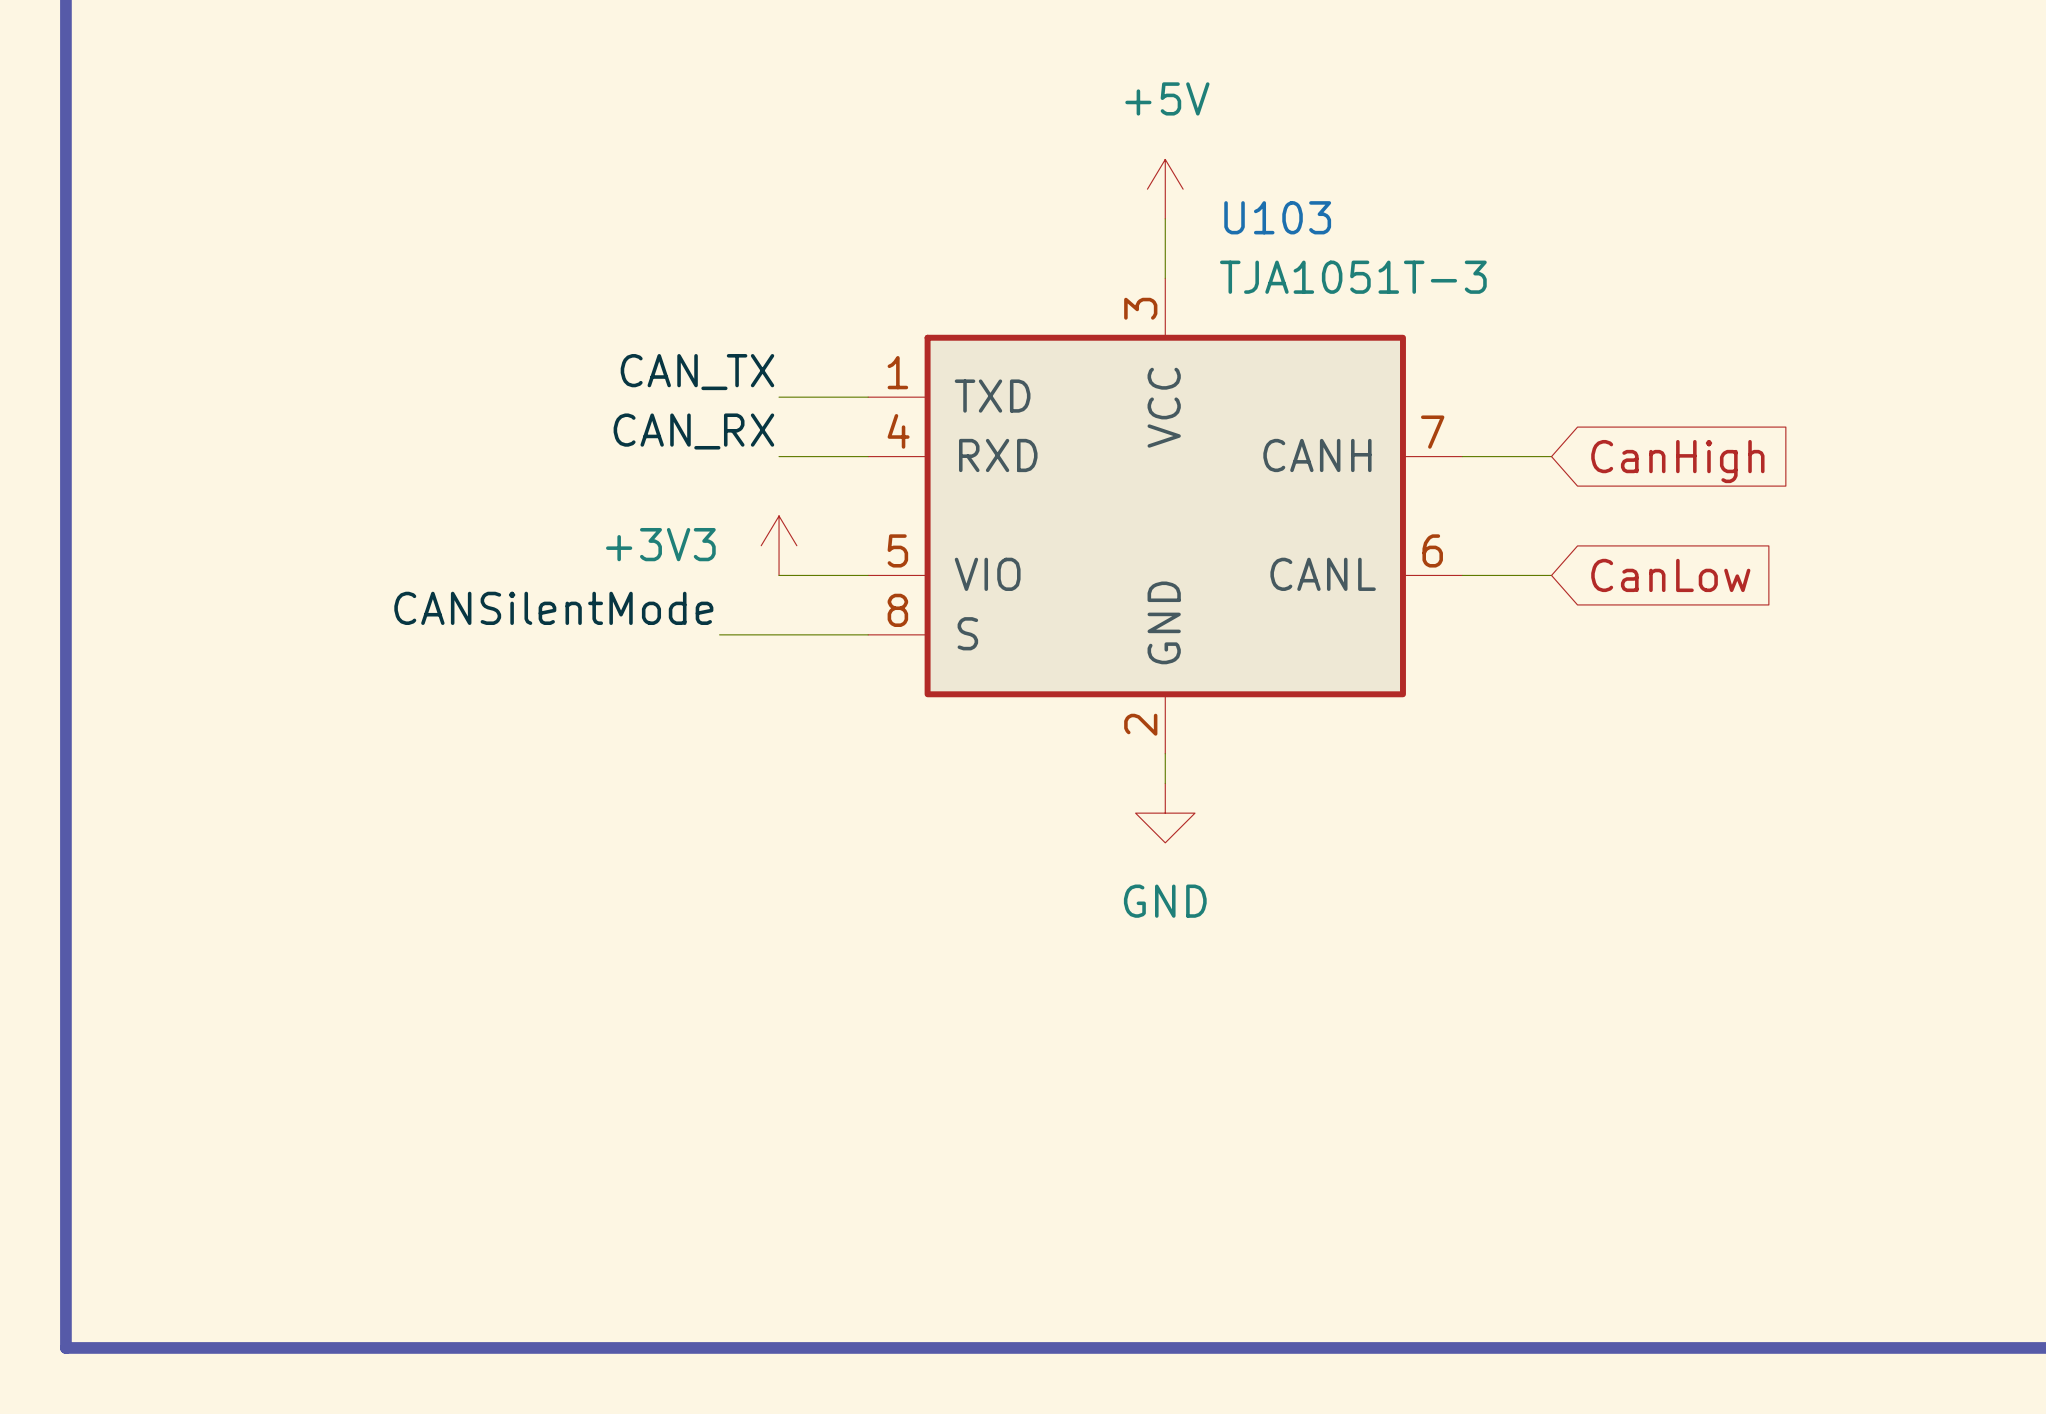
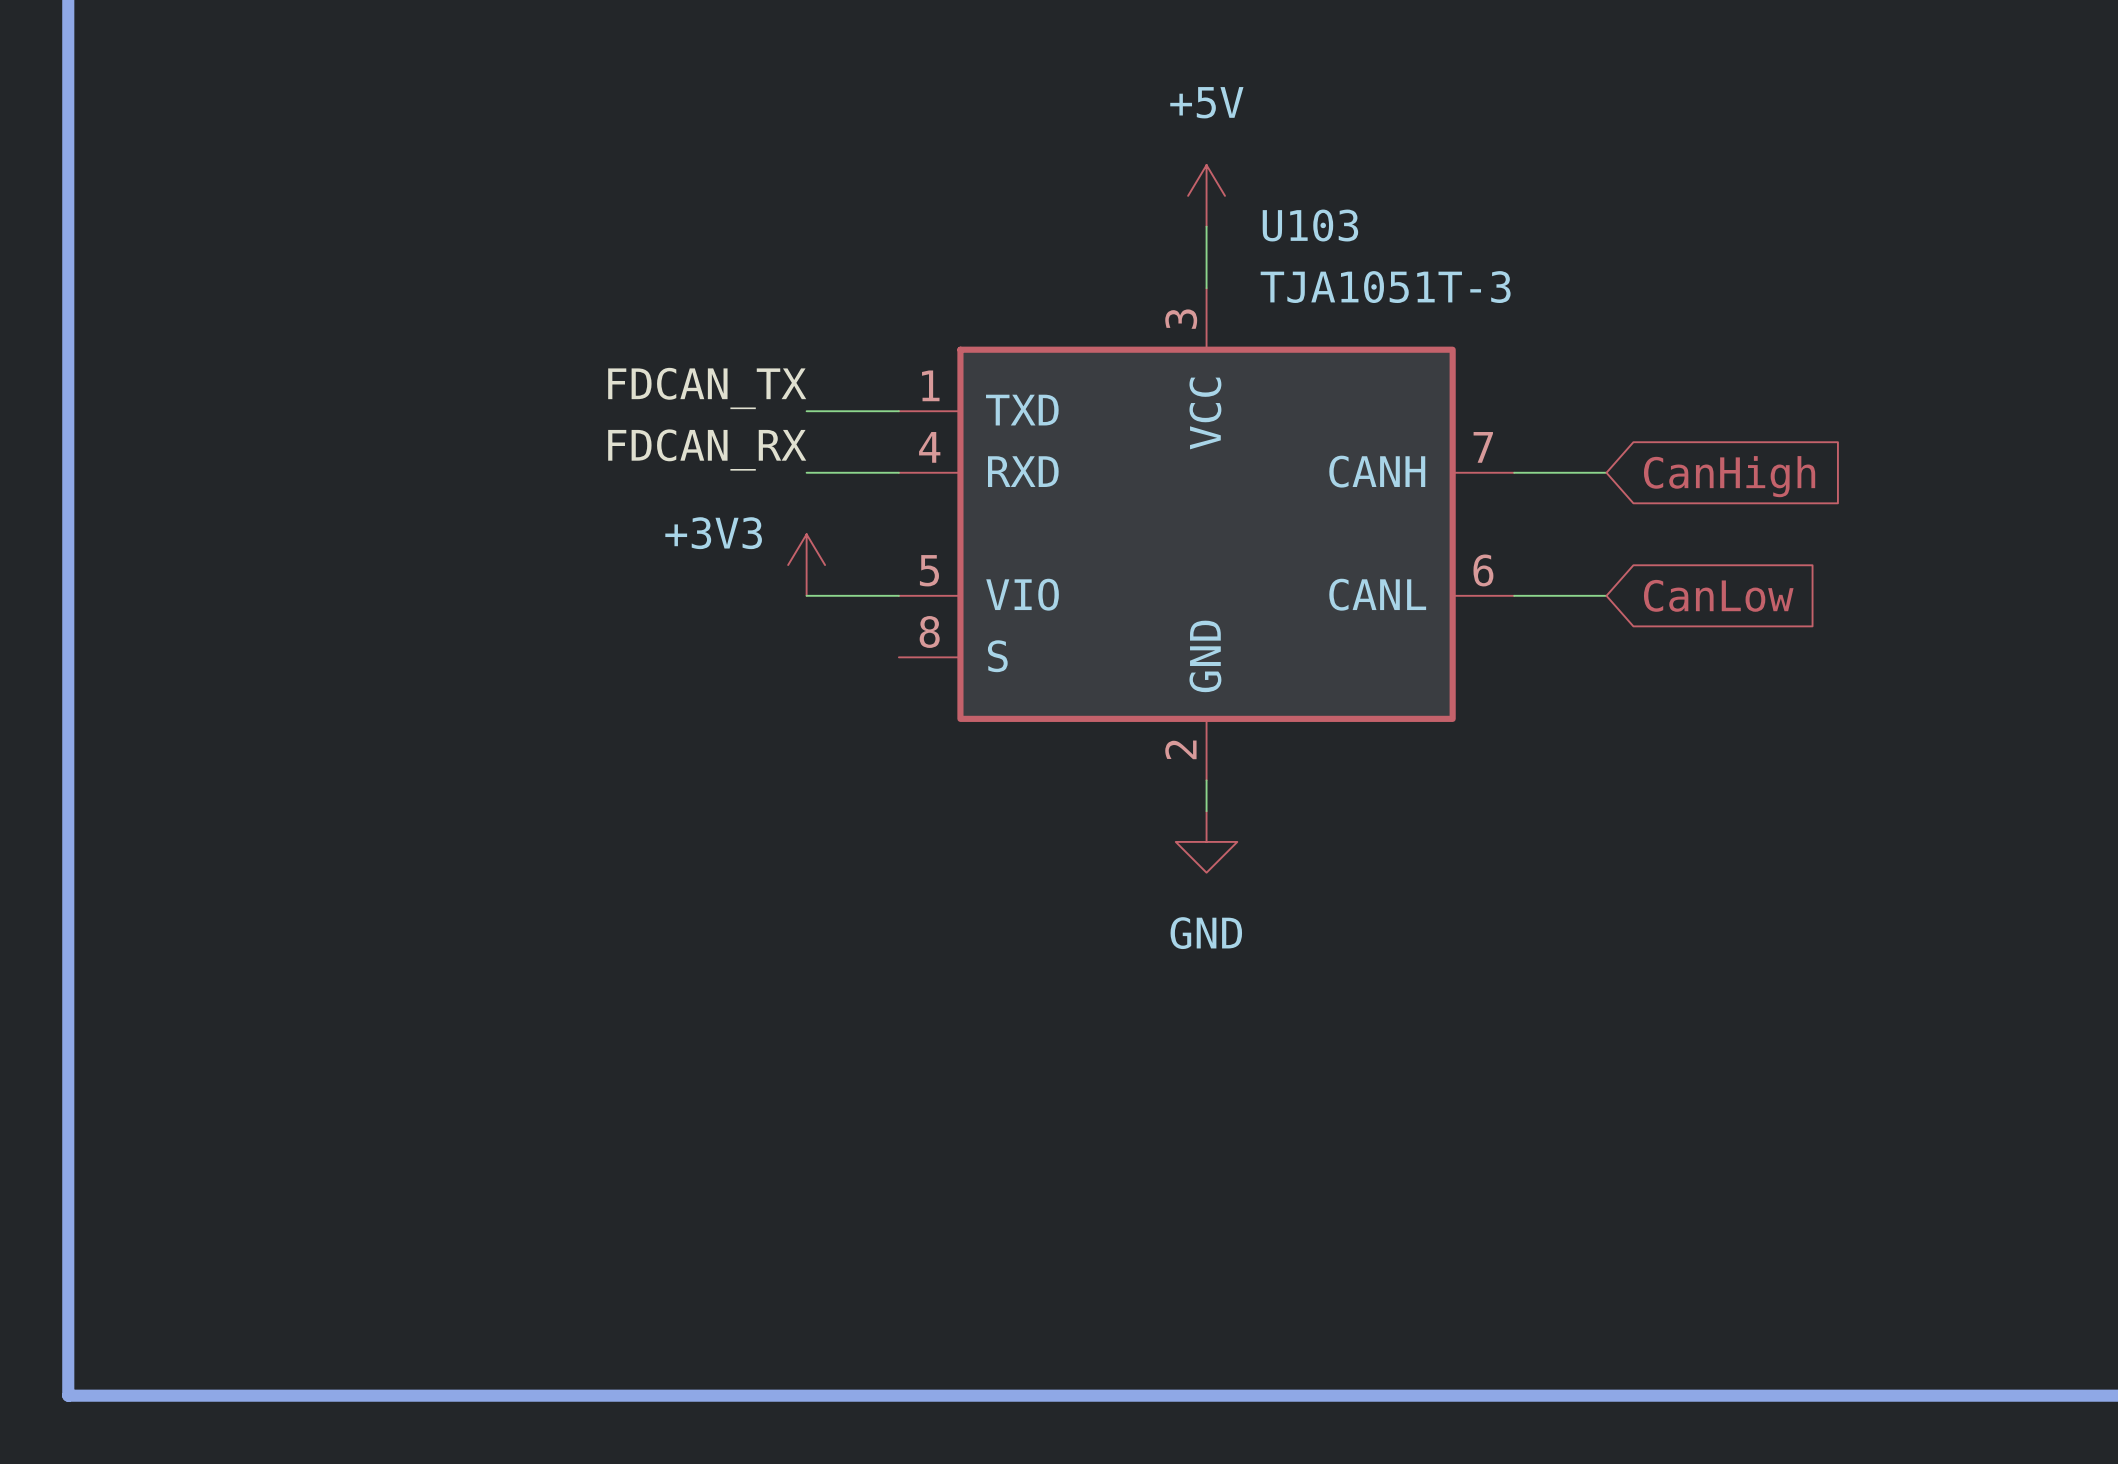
label: CAN_TX (697, 372) -> FDCAN_TX (707, 388)
label: CAN_RX (693, 431) -> FDCAN_RX (707, 450)
power symbol text position: +3V3 (660, 544) -> +3V3 (713, 533)
label: CANSilentMode (553, 608) -> none
wire: (719, 634) (868, 634) -> none

